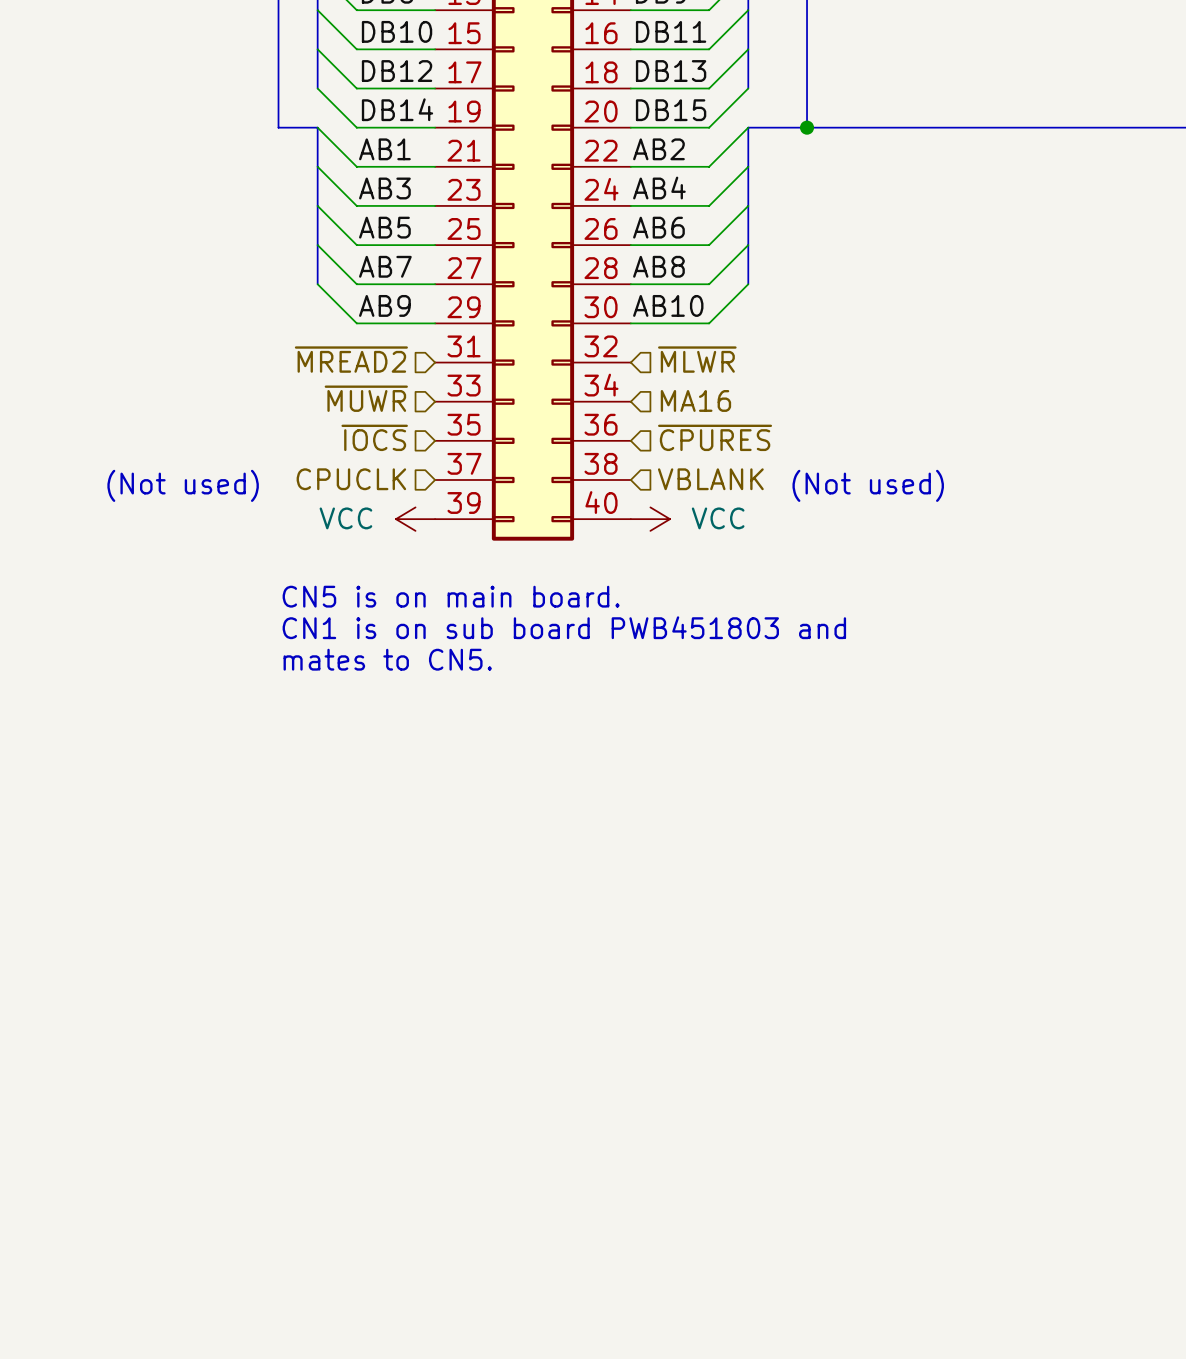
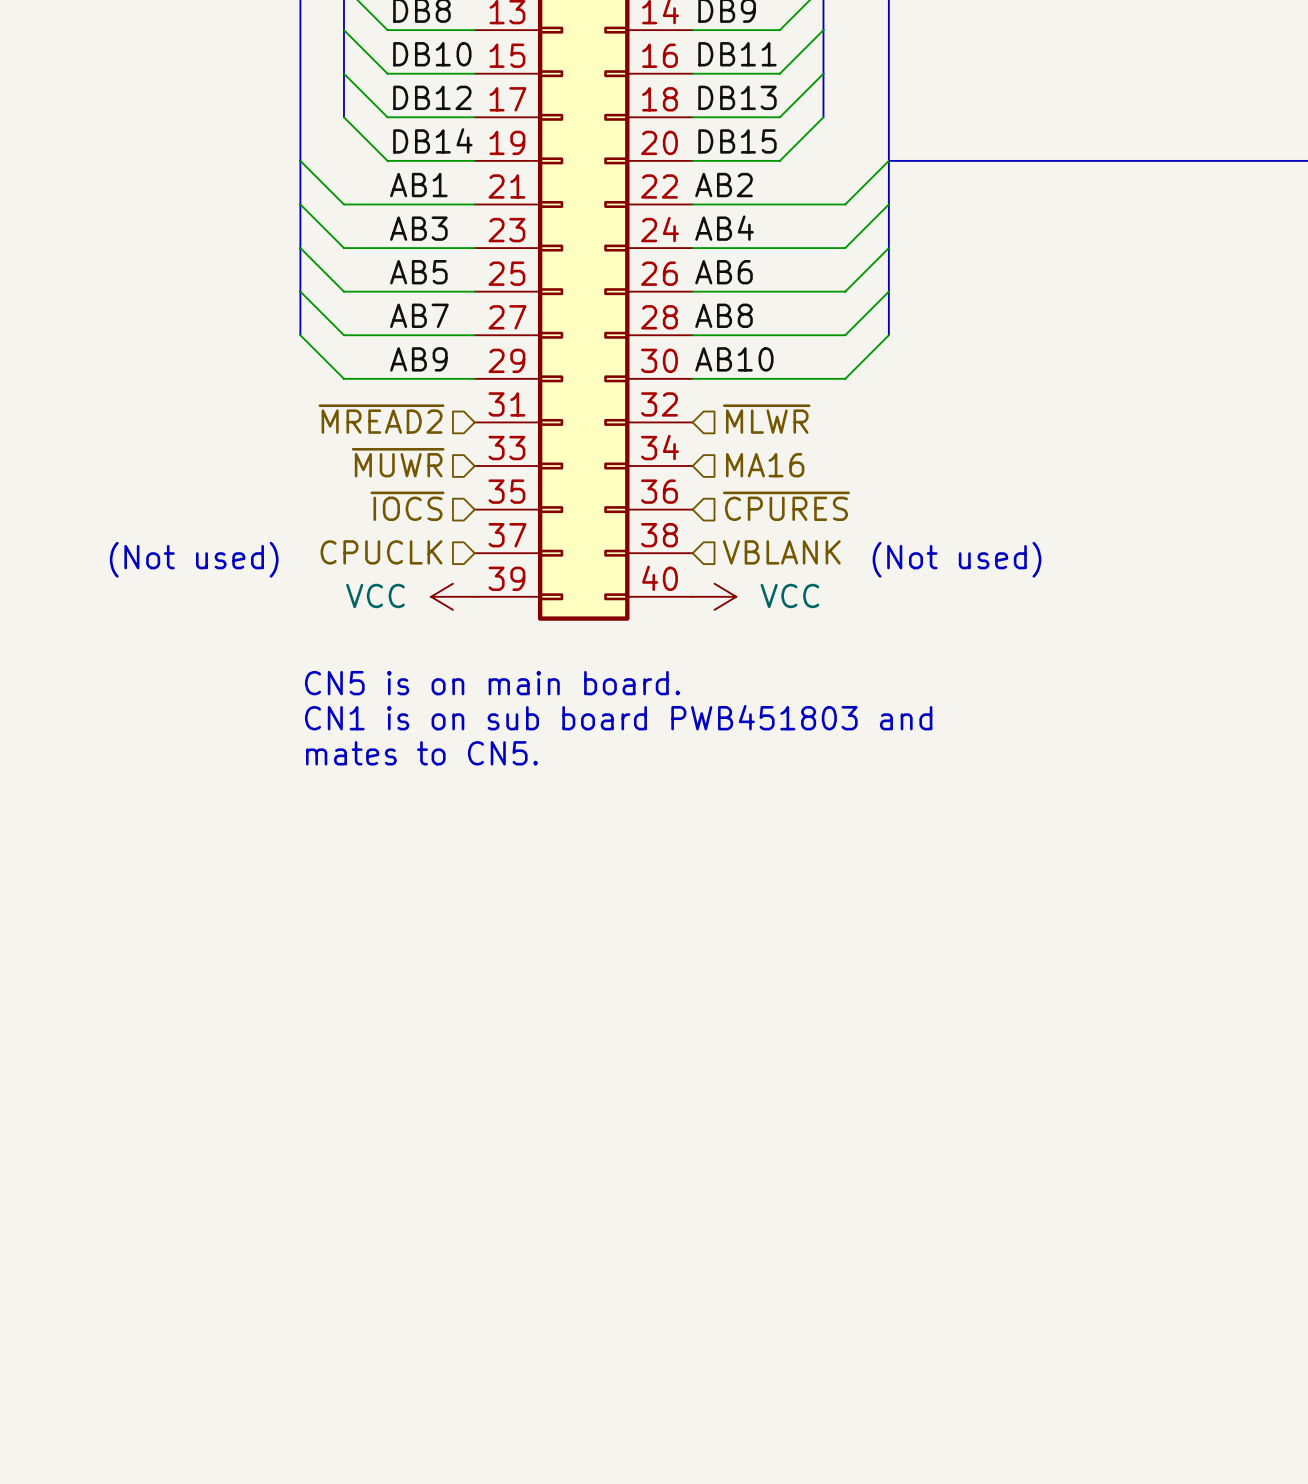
bus: (278, 127) (317, 127) (317, 284) -> (300, 160) (300, 335)
wire: (317, 127) (356, 166) -> (300, 160) (343, 204) (387, 204)
wire: (748, 127) (709, 166) -> (888, 160) (845, 204) (779, 204)
bus: (807, 127) (748, 127) (748, 284) -> (888, 160) (888, 335)
junction: (807, 127) -> none
wire: (317, 166) (356, 205) -> (300, 204) (343, 248) (387, 248)
wire: (748, 166) (709, 205) -> (888, 204) (845, 248) (779, 248)
wire: (317, 205) (356, 245) -> (300, 248) (343, 291) (387, 291)
wire: (748, 205) (709, 245) -> (888, 248) (845, 291) (779, 291)
wire: (317, 245) (356, 284) -> (300, 291) (343, 335) (387, 335)
wire: (748, 245) (709, 284) -> (888, 291) (845, 335) (779, 335)
wire: (317, 284) (356, 323) -> (300, 335) (343, 378) (387, 378)
wire: (748, 284) (709, 323) -> (888, 335) (845, 378) (779, 378)

